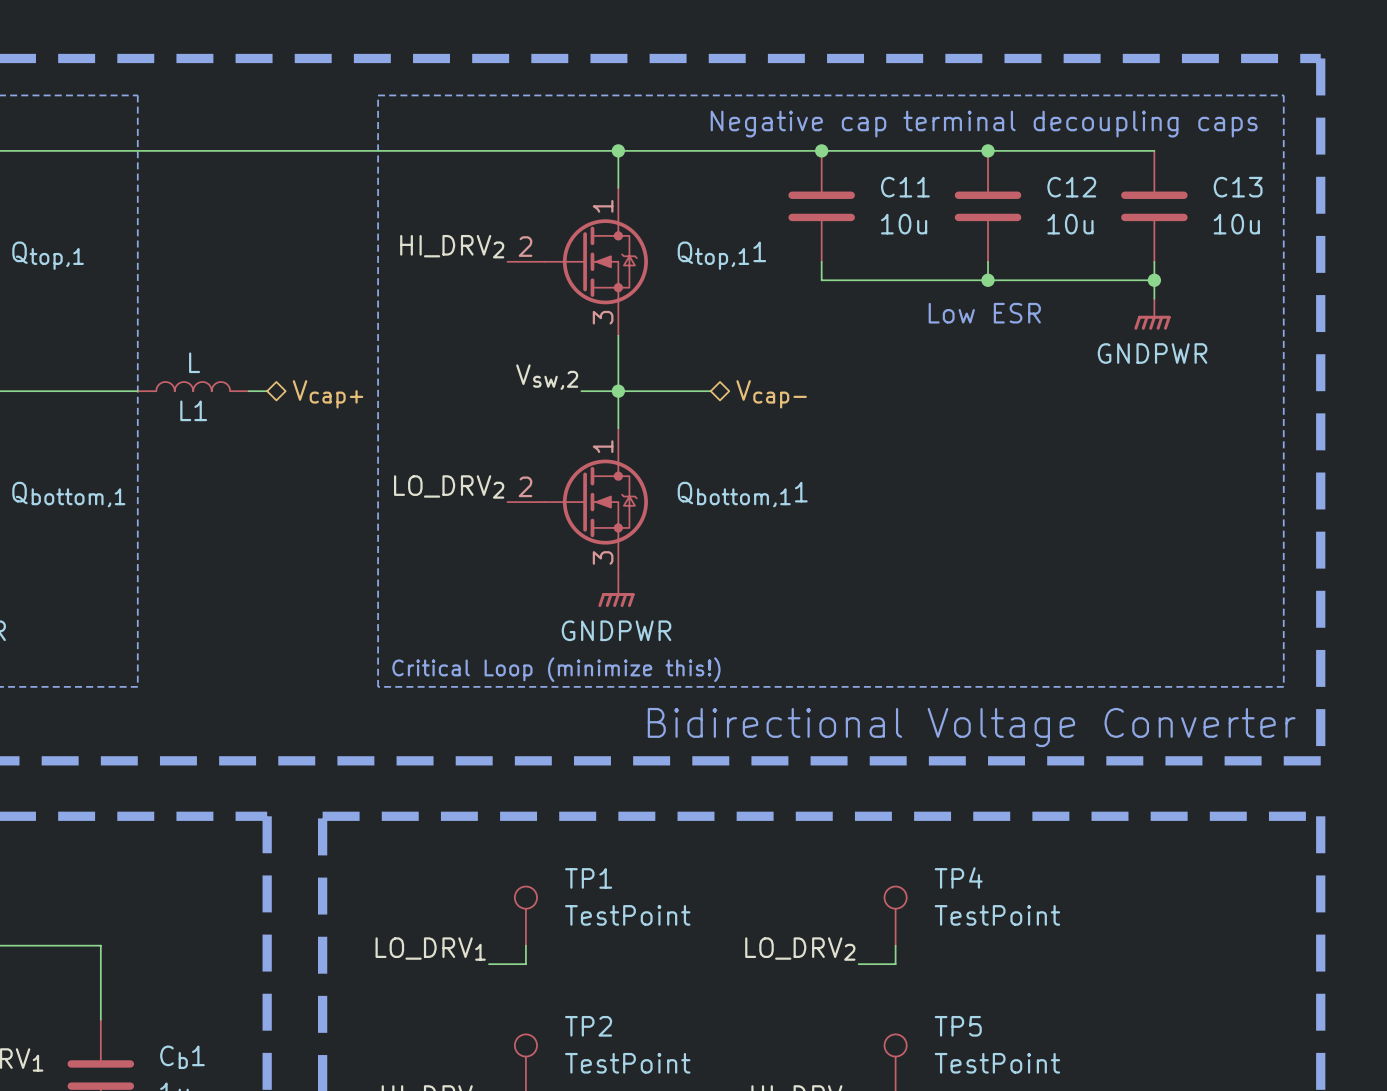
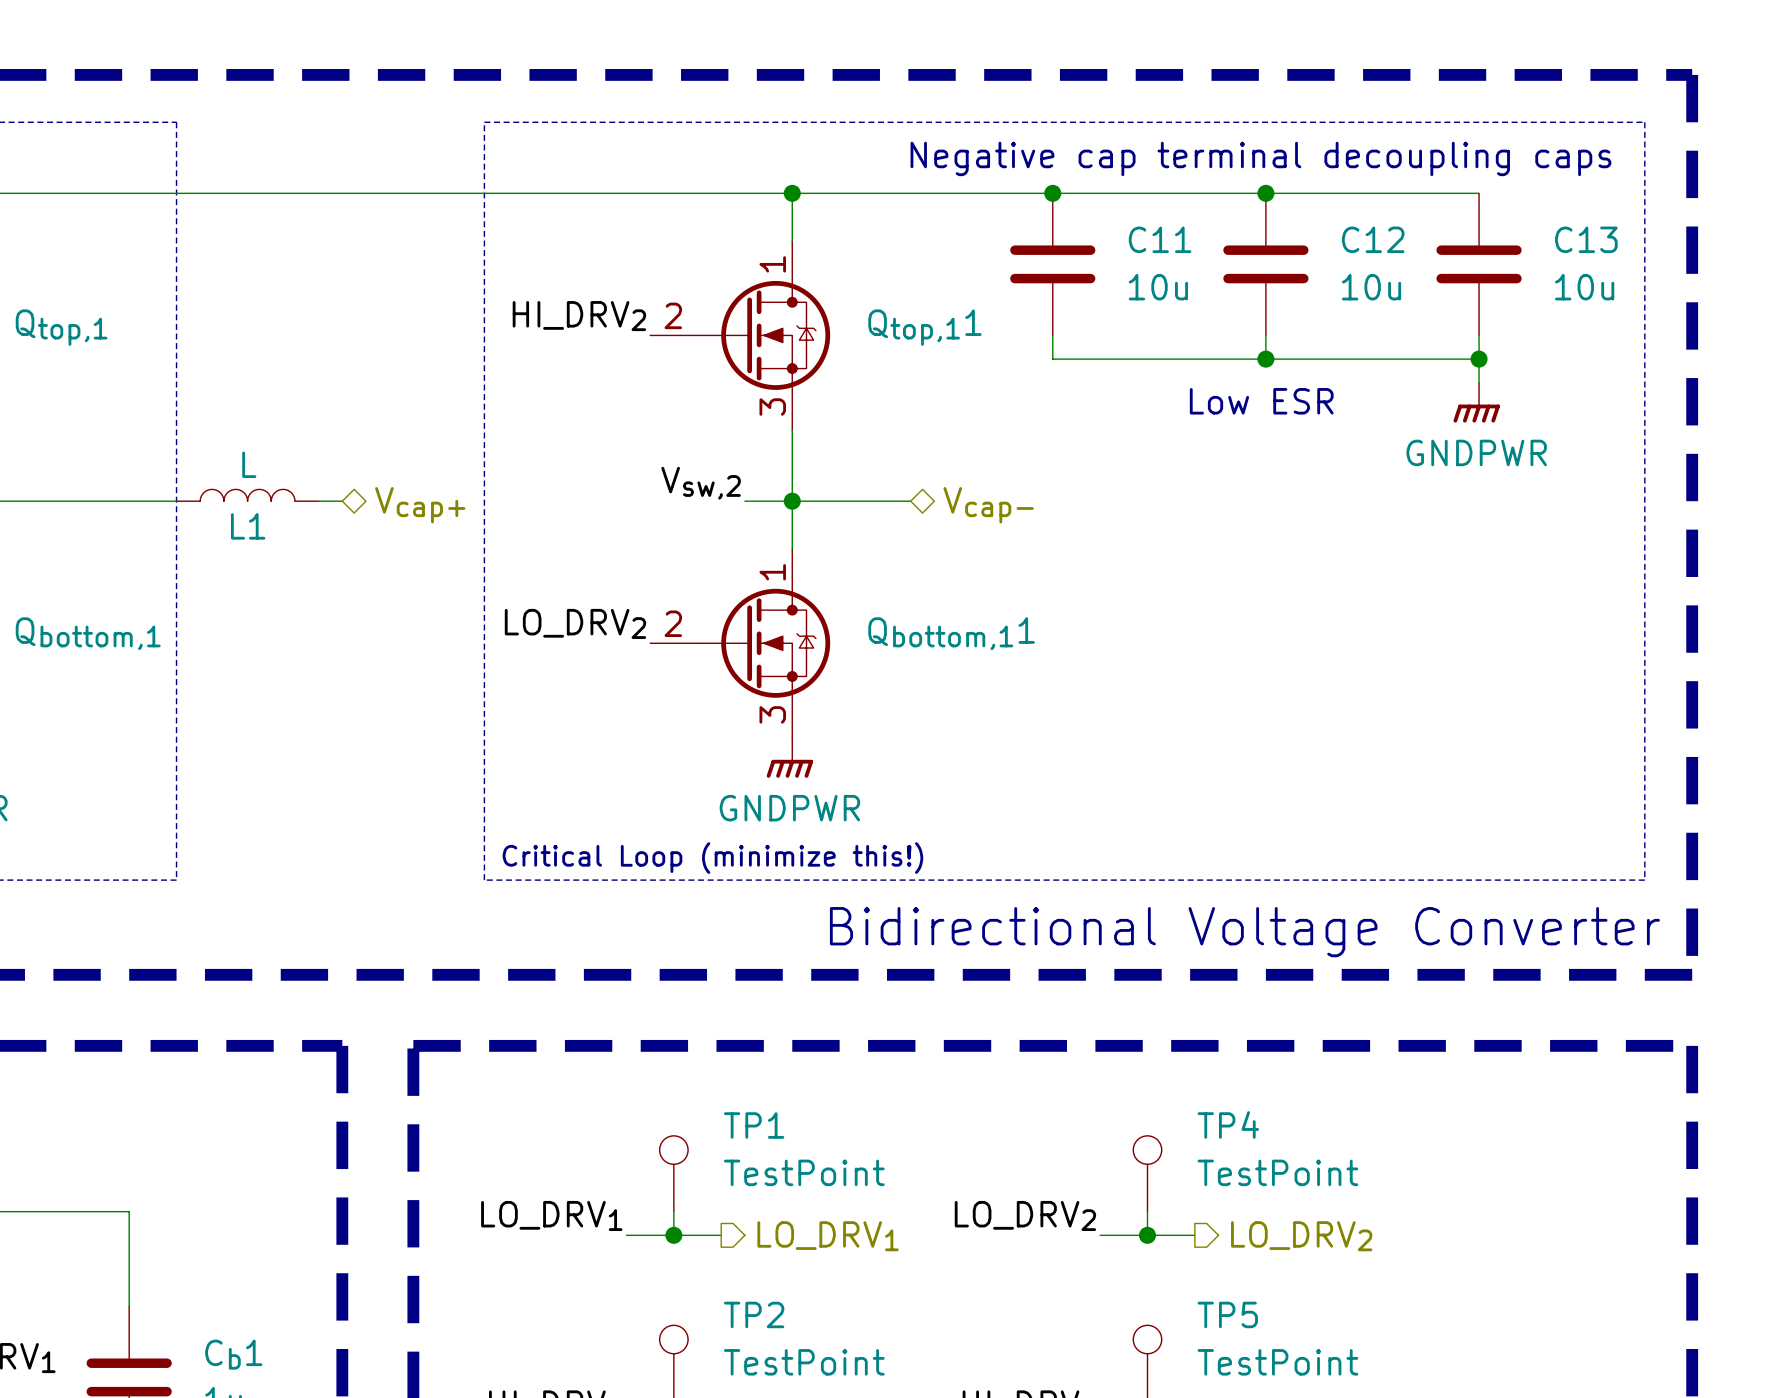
wire: none -> (673, 1235) (721, 1235)
junction: none -> (673, 1235)
hierarchical label: none -> LO_DRV1 (828, 1236)
wire: none -> (1147, 1235) (1194, 1235)
junction: none -> (1147, 1235)
hierarchical label: none -> LO_DRV2 (1301, 1236)

